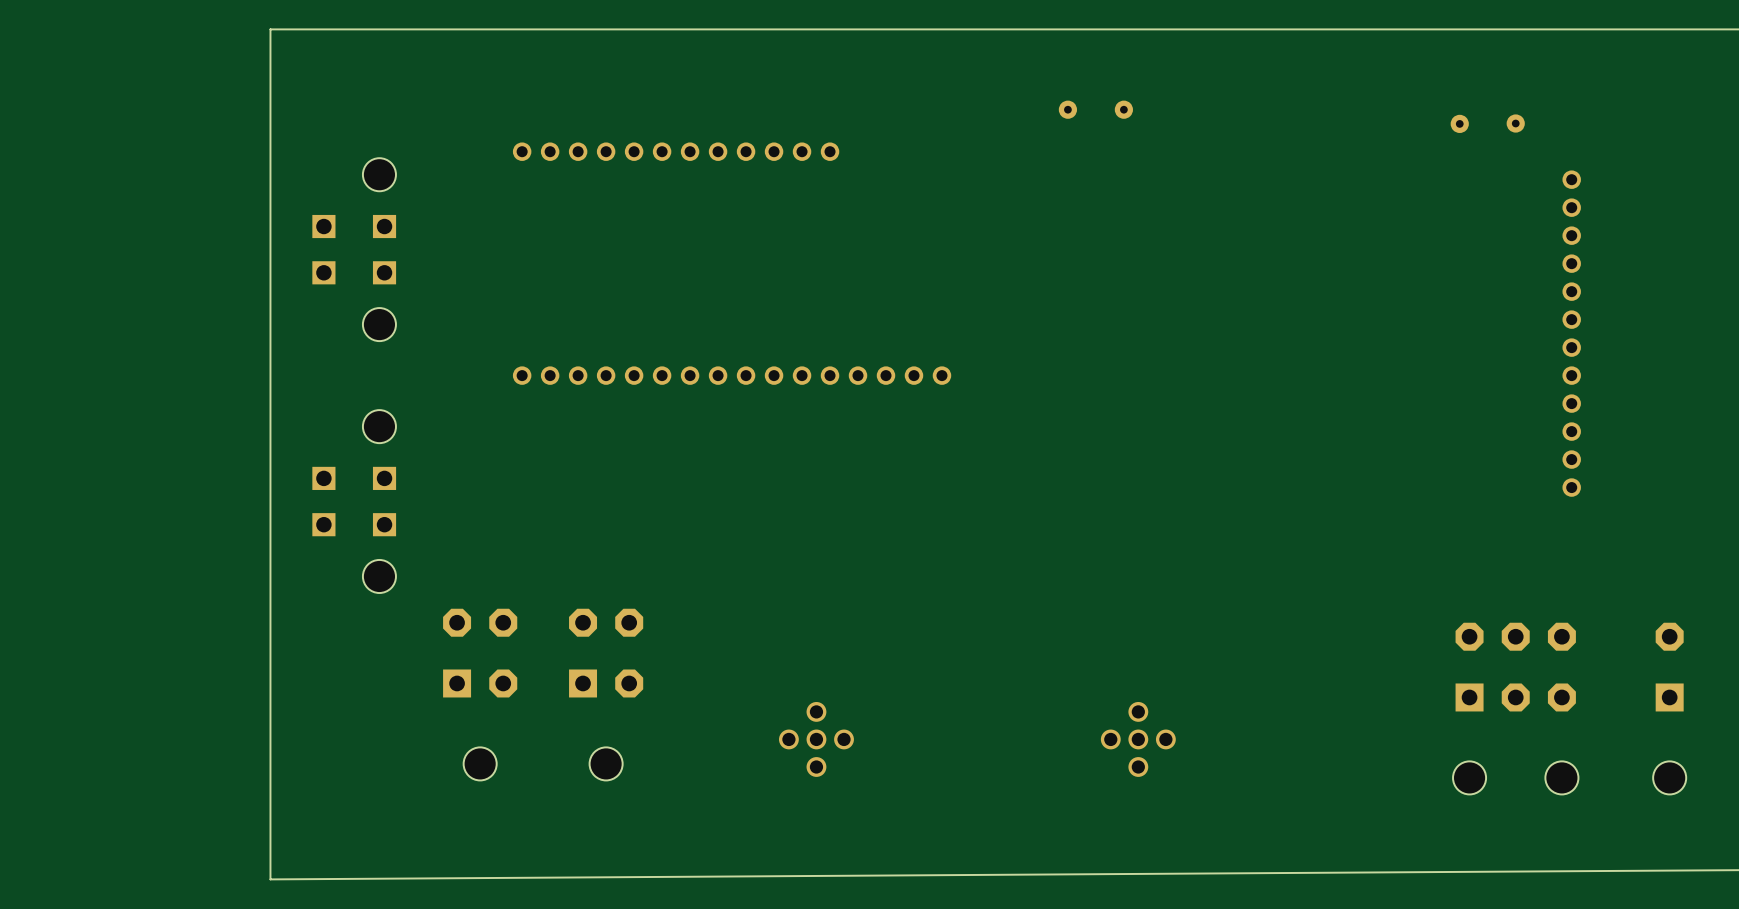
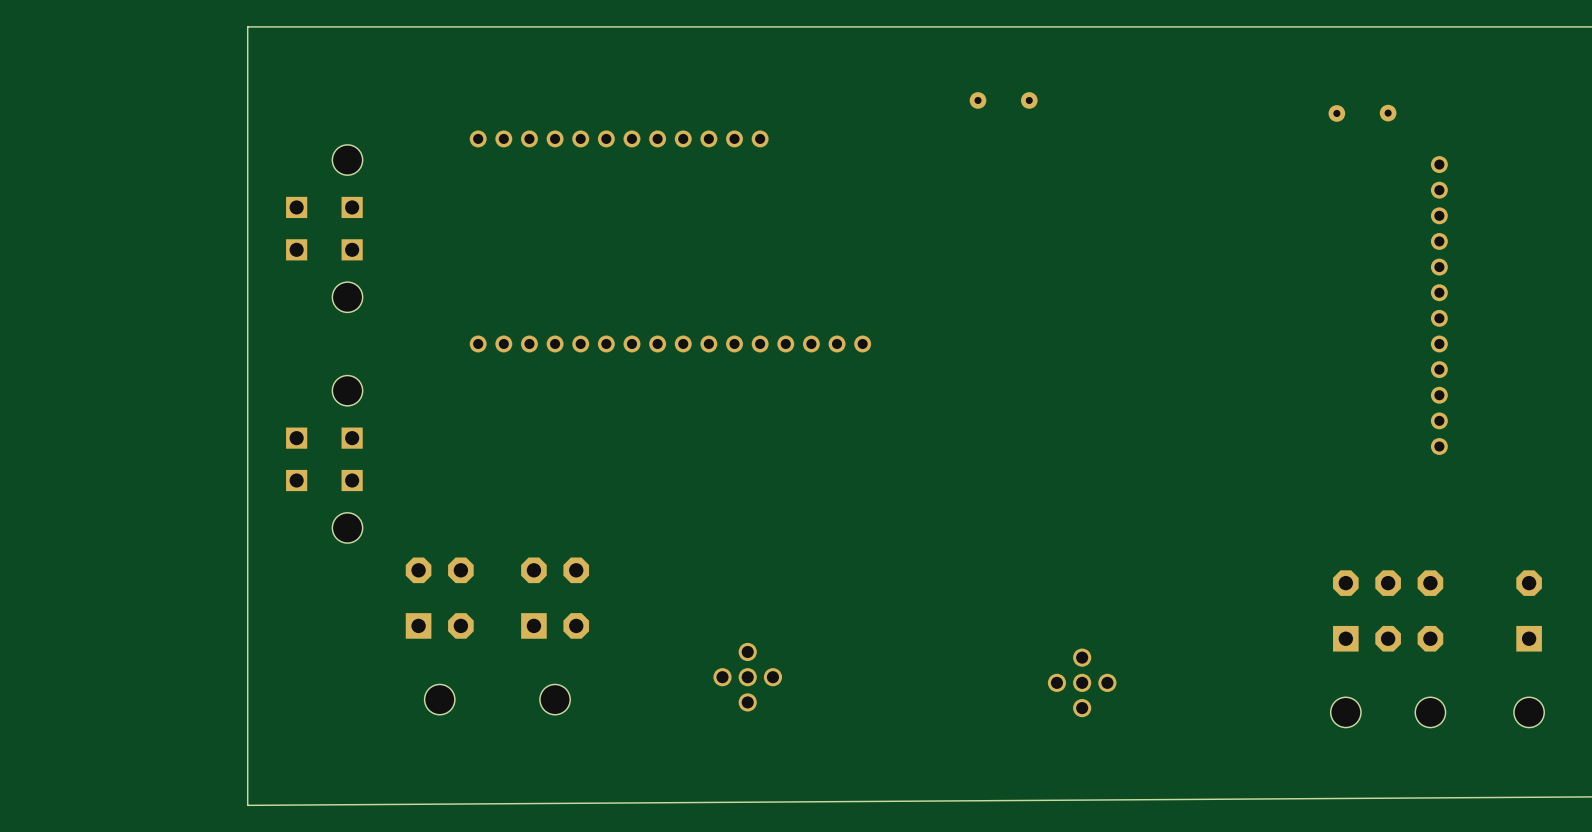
part position: (1138, 739) -> (1082, 682)

